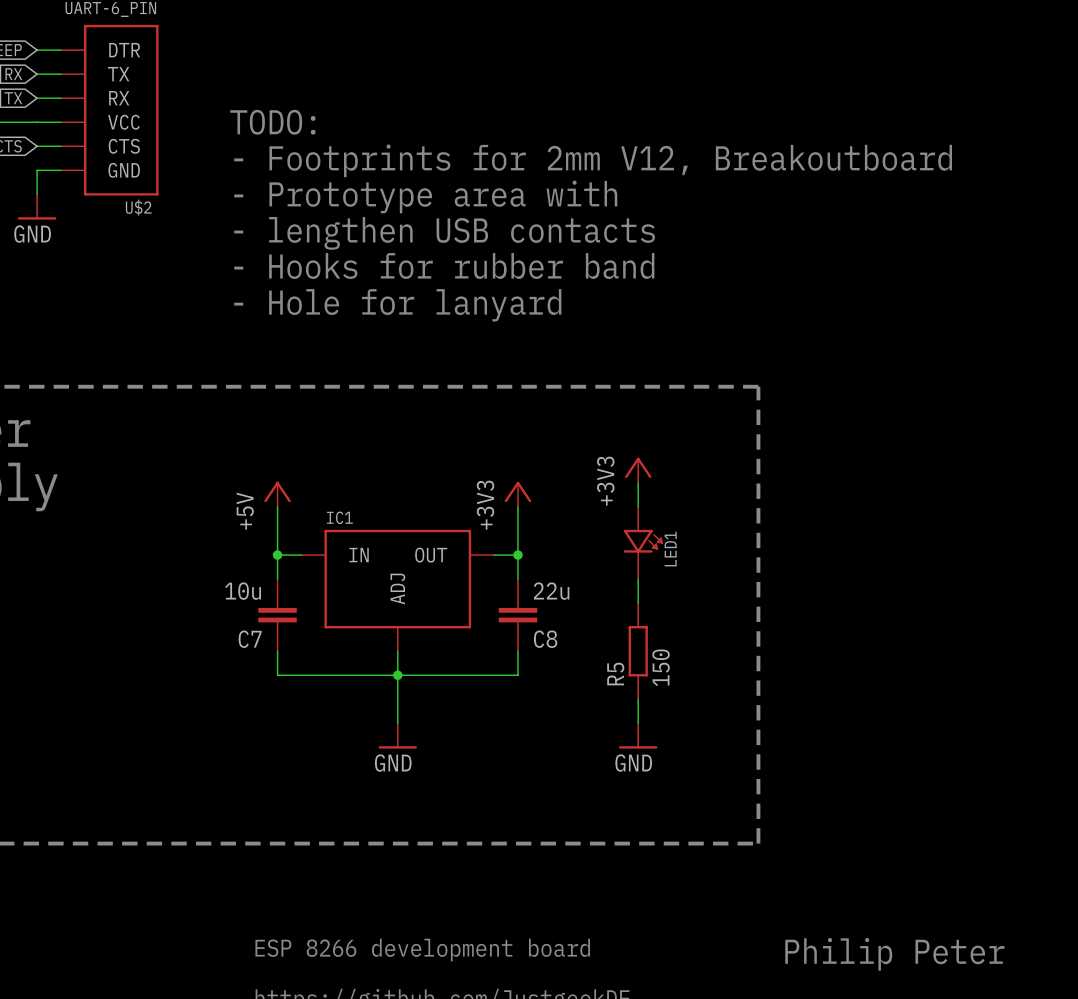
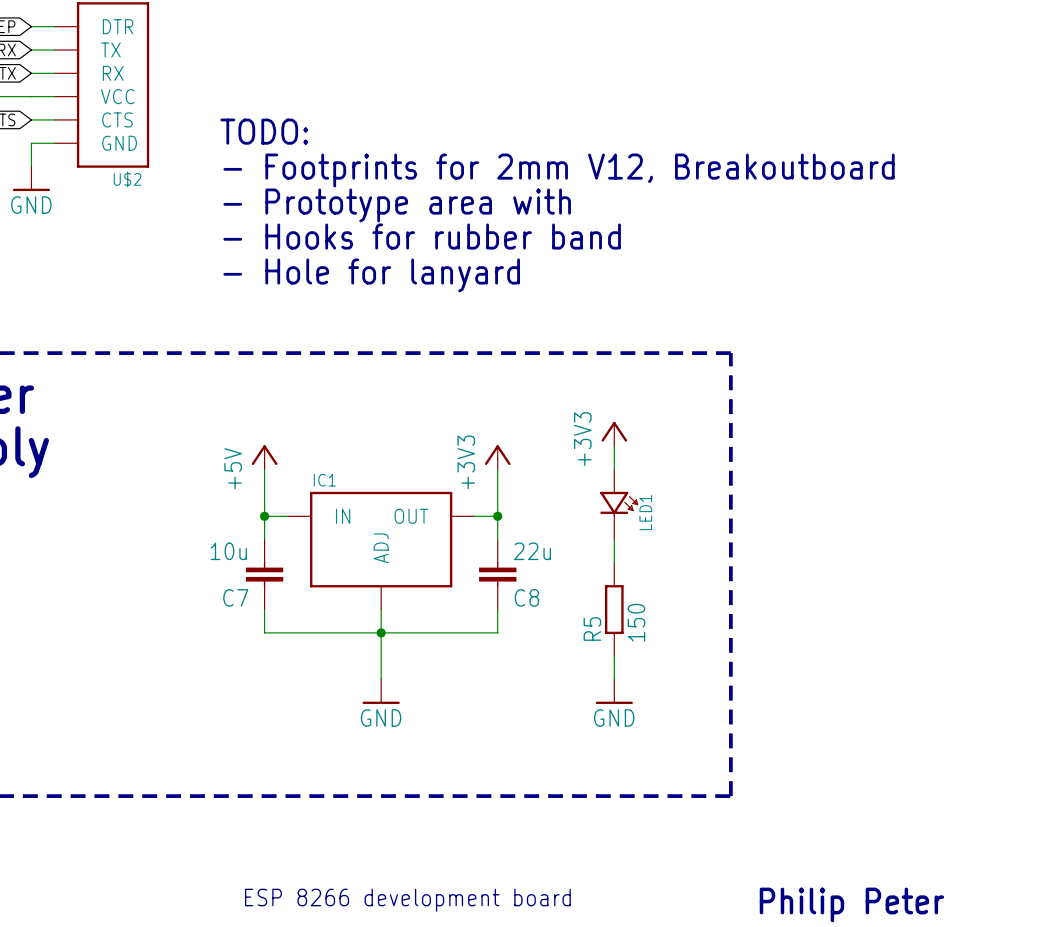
text: TODO: (272, 122) -> none
text: - Footprints for 2mm V12, Breakoutboard (593, 160) -> TODO: (264, 131)
text: - Prototype area with (425, 196) -> - Footprints for 2mm V12, Breakoutboard (559, 170)
text: - lengthen USB contacts (444, 233) -> - Prototype area with (397, 205)

